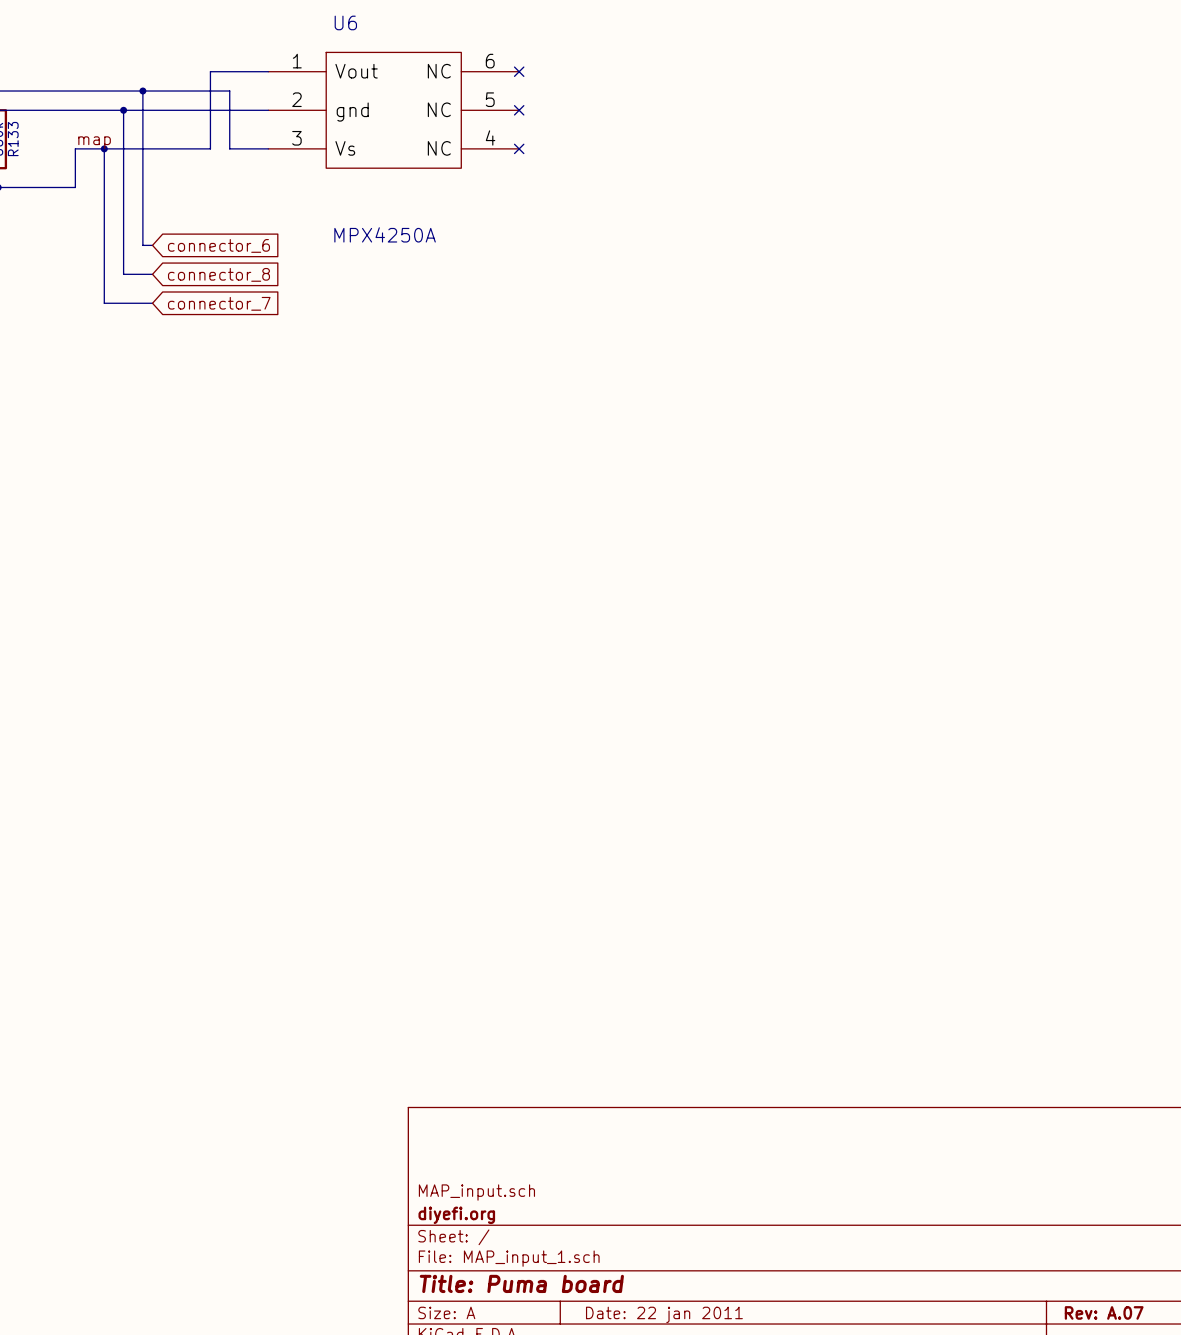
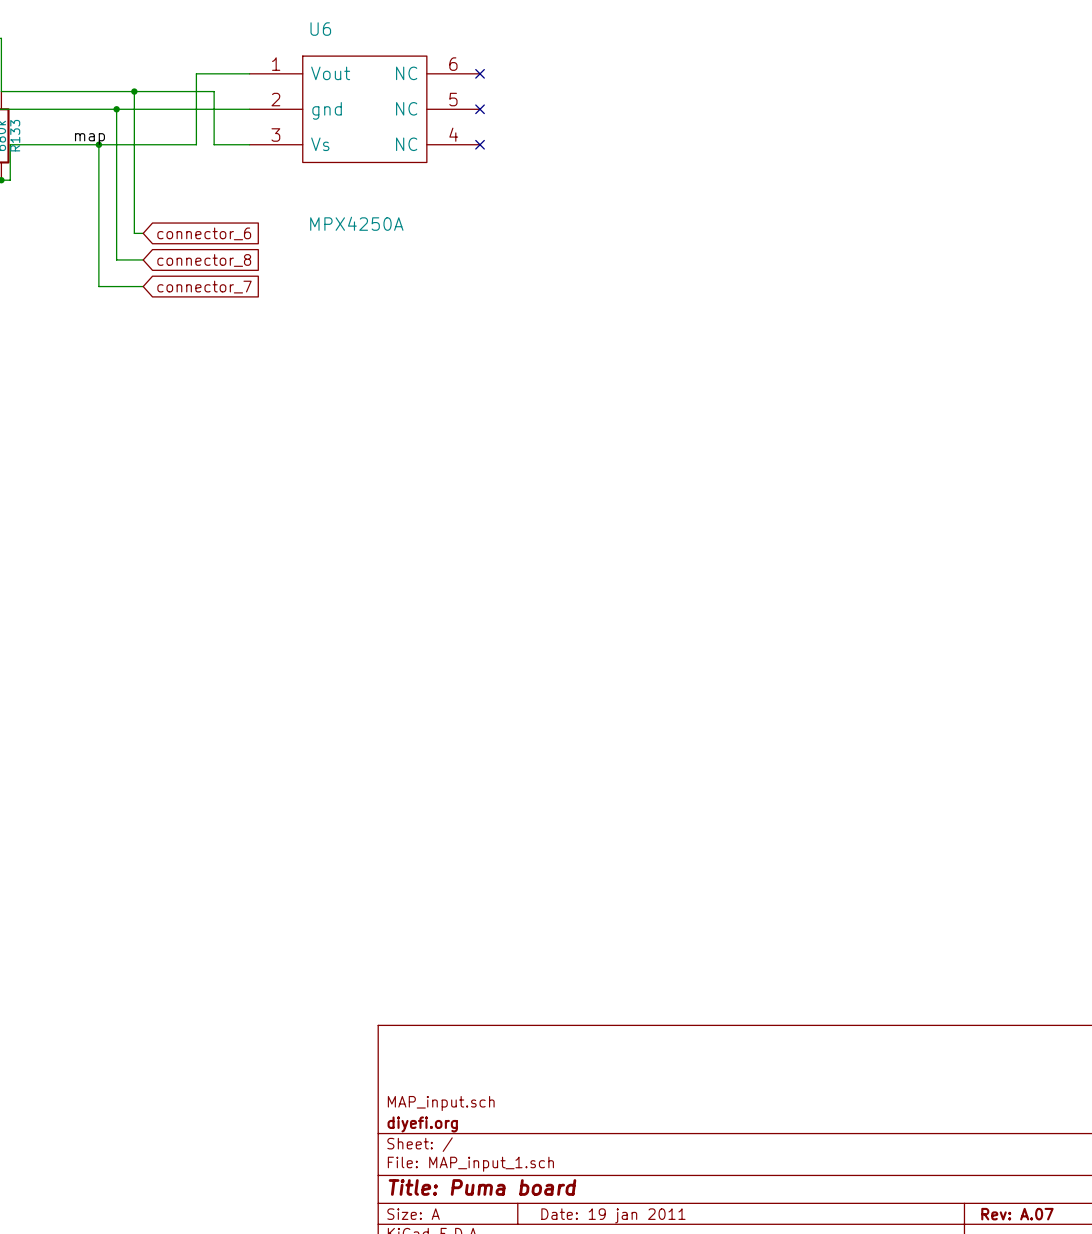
wire: (75, 148) (75, 187) (7, 187) -> (72, 144) (10, 144) (10, 180)
title block: Date: 22 jan 2011 (664, 1314) -> Date: 19 jan 2011 (613, 1215)

